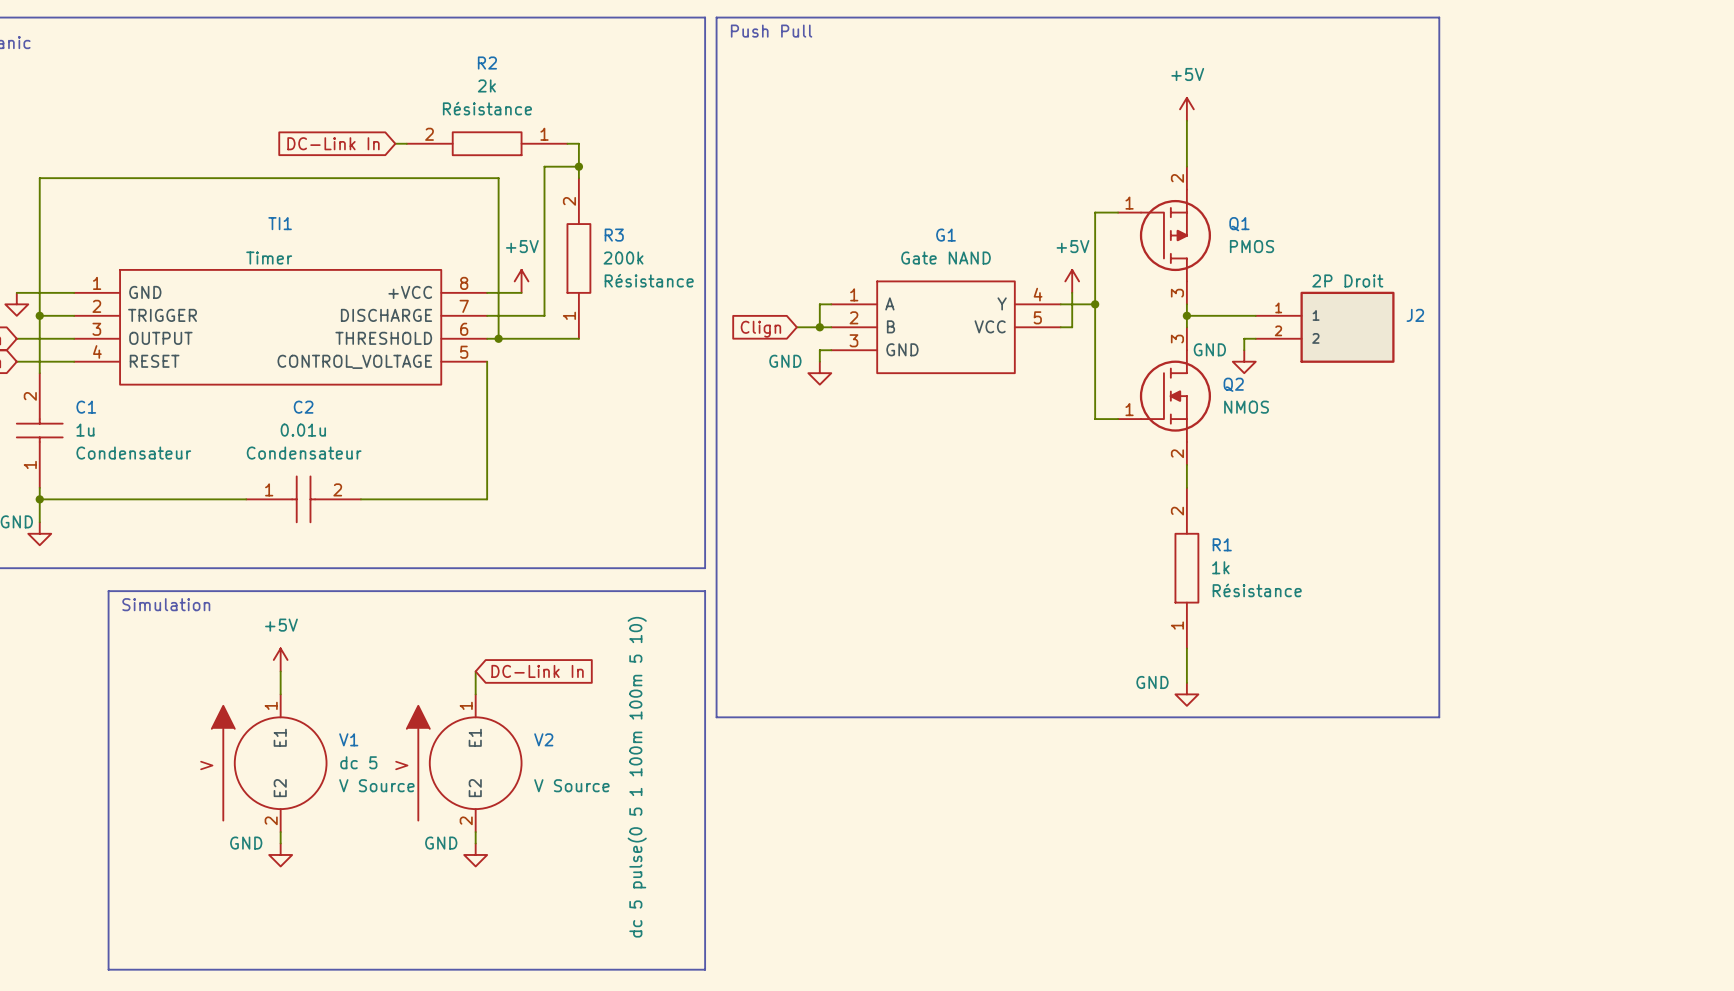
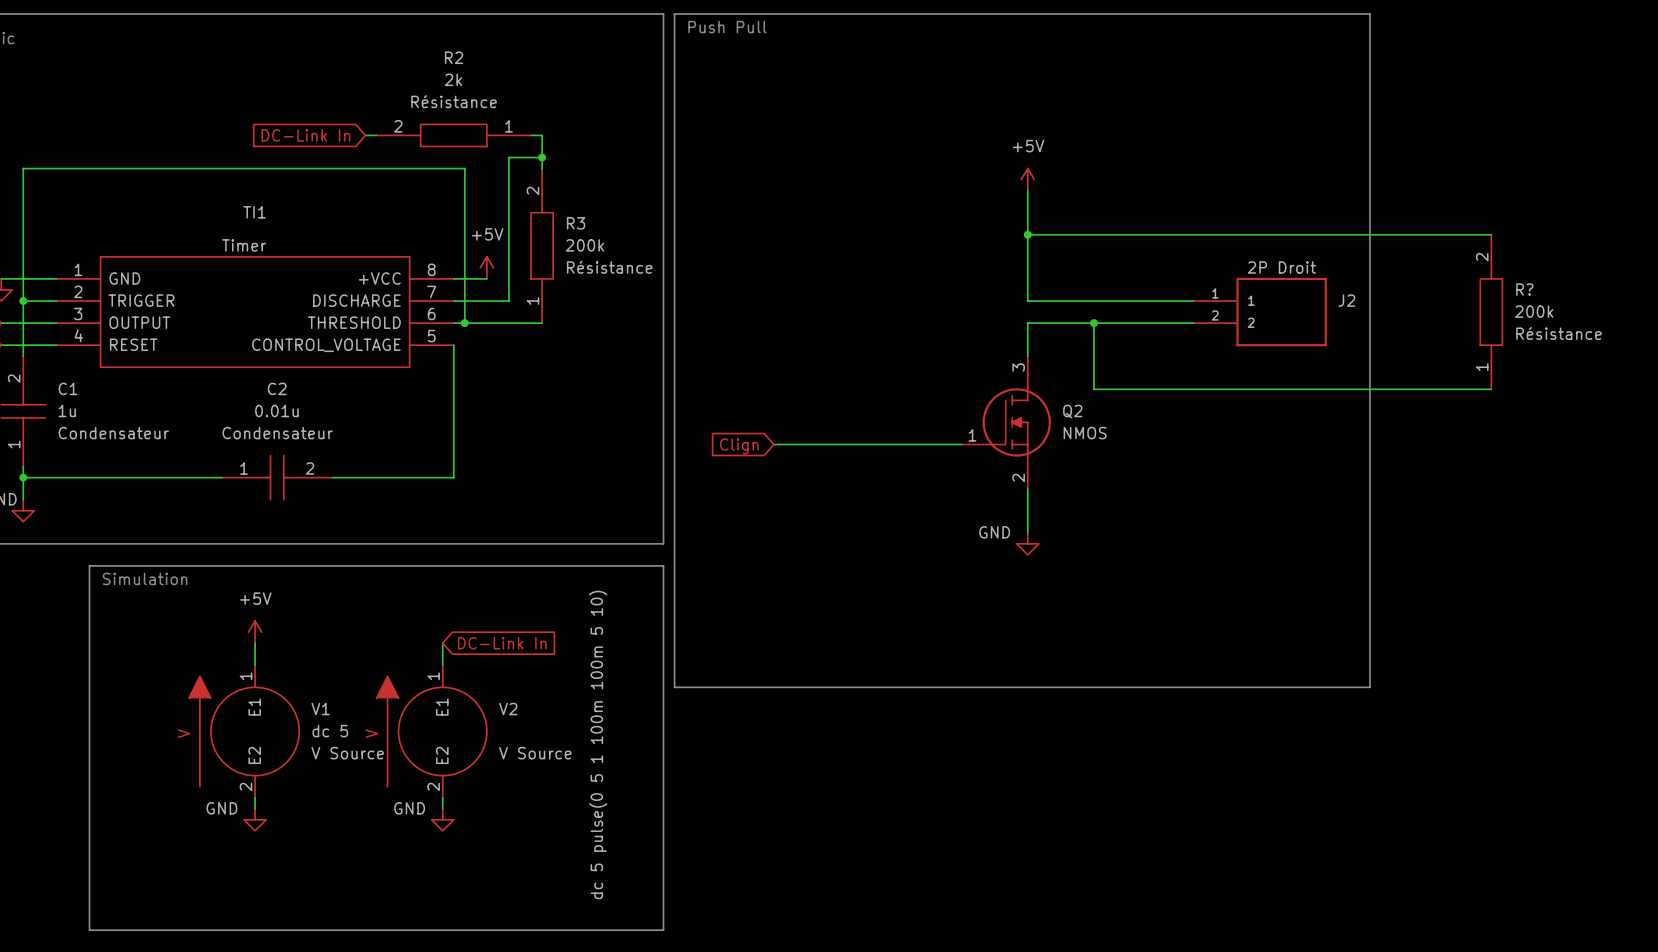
power symbol: +5V (1186, 109) -> none
wire: (1186, 120) (1186, 166) -> none
power symbol: none -> +5V (1027, 179)
wire: none -> (1027, 190) (1027, 301) (1127, 301)
wire: (1118, 212) (1095, 212) (1095, 419) (1118, 419) -> none
Q1: (1164, 235) -> none
wire: none -> (1027, 234) (1491, 234)
junction: none -> (1027, 234)
power symbol: +5V (1072, 281) -> none
wire: (1072, 292) (1072, 327) (1060, 327) -> none
wire: (831, 304) (819, 304) (819, 327) -> none
wire: (1060, 304) (1095, 304) -> none
junction: (1095, 304) -> none
wire: (1186, 304) (1186, 327) -> none
junction: (1186, 315) -> none
wire: (796, 327) (831, 327) -> none
junction: (819, 327) -> none
G1: (946, 327) -> none
R?: none -> (1491, 312)
global label position: Clign (760, 329) -> Clign (739, 446)
wire: none -> (1093, 323) (1093, 389) (1491, 389)
junction: none -> (1093, 323)
wire: (1244, 338) (1244, 350) -> (1182, 323) (1027, 323) (1027, 356)
wire: (831, 350) (819, 350) (819, 361) -> none
power symbol: GND (1244, 361) -> none
power symbol: GND (819, 373) -> none
Q2 position: (1164, 396) -> (1006, 422)
wire: none -> (773, 444) (961, 444)
wire: (1186, 464) (1186, 487) -> none
wire: none -> (1027, 488) (1027, 532)
power symbol: none -> GND (1027, 543)
R1: (1186, 568) -> none
wire: (1186, 648) (1186, 682) -> none
power symbol: GND (1186, 694) -> none

